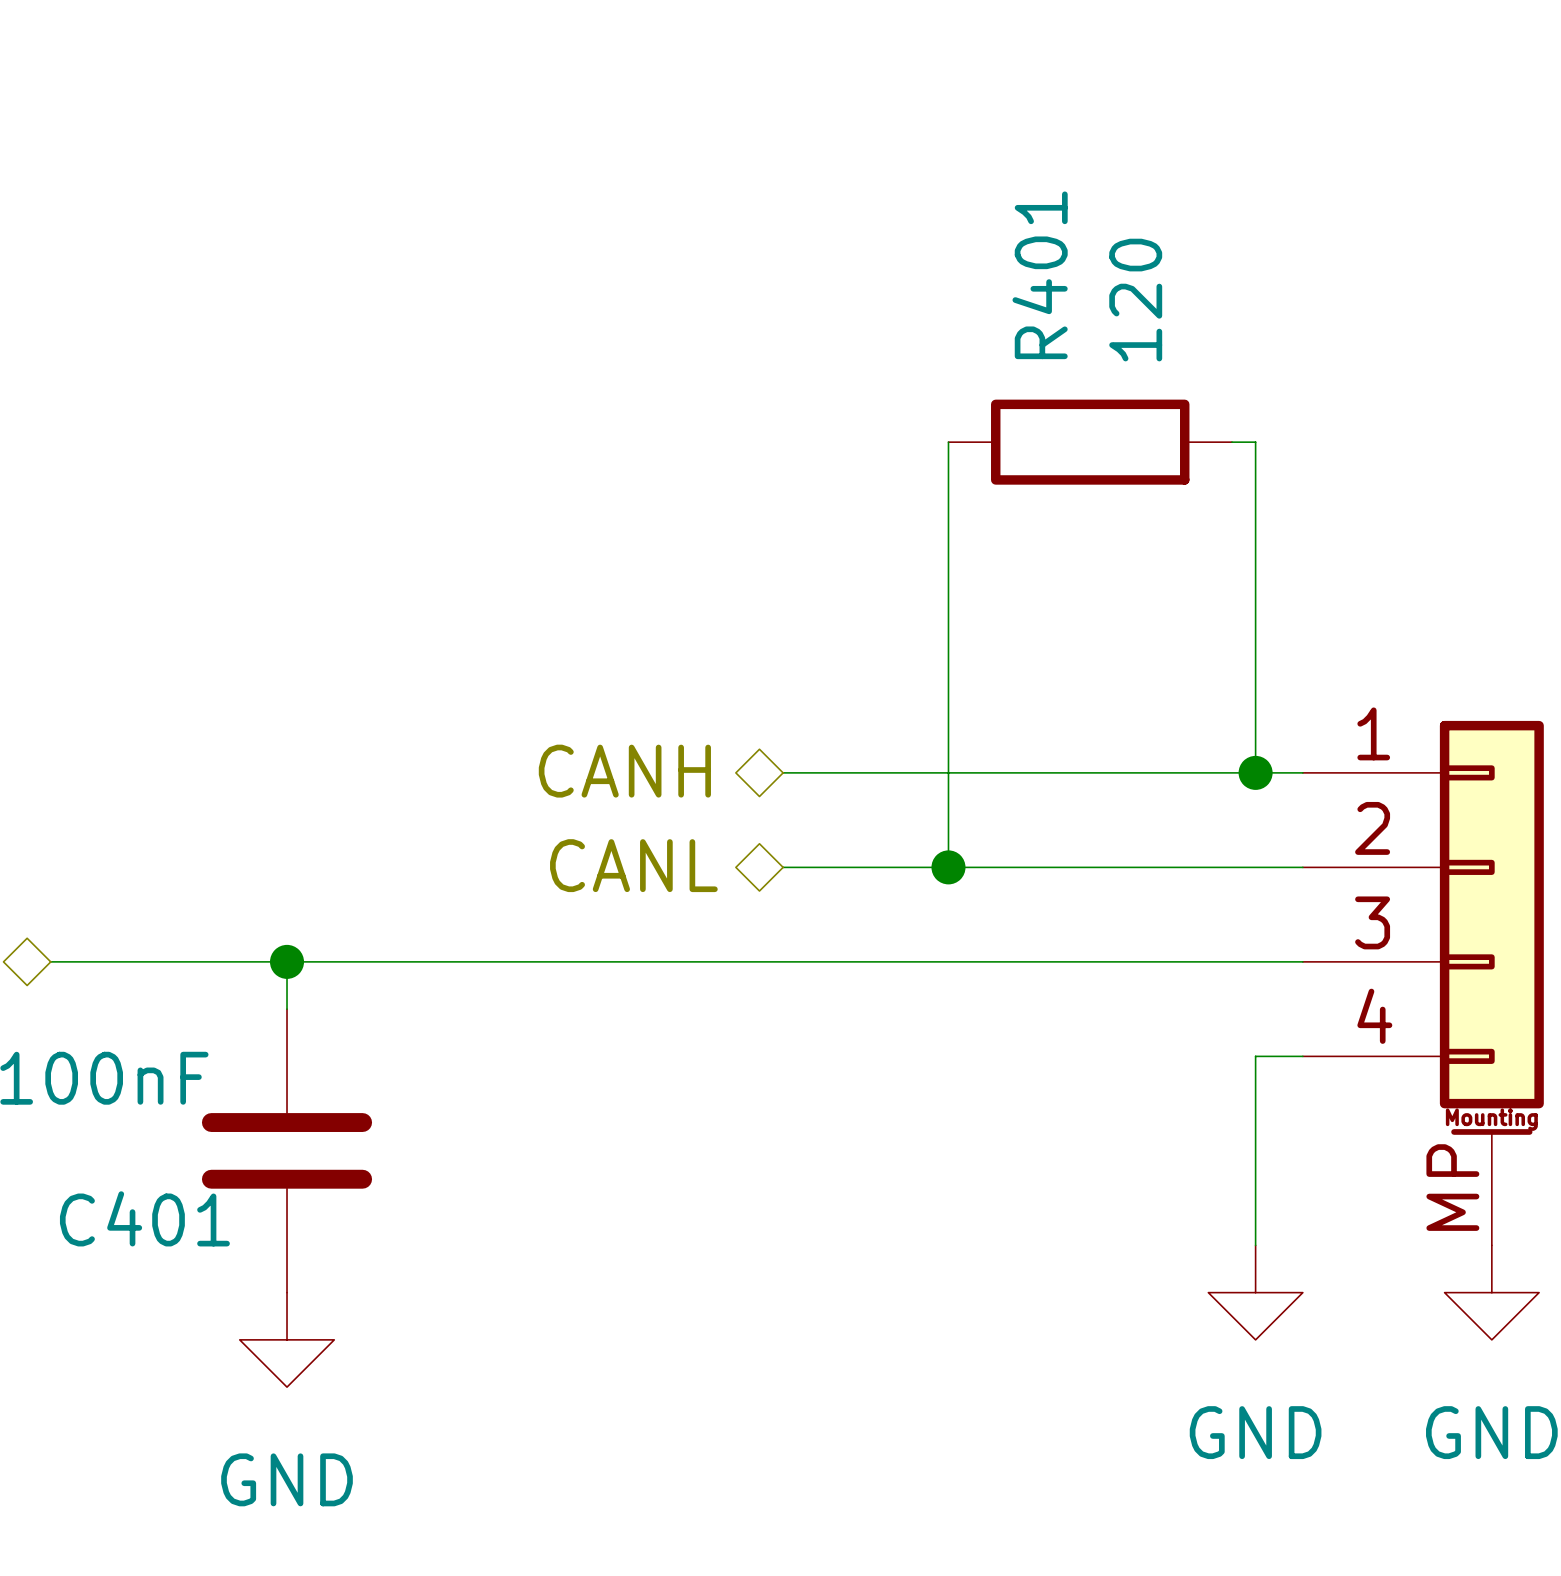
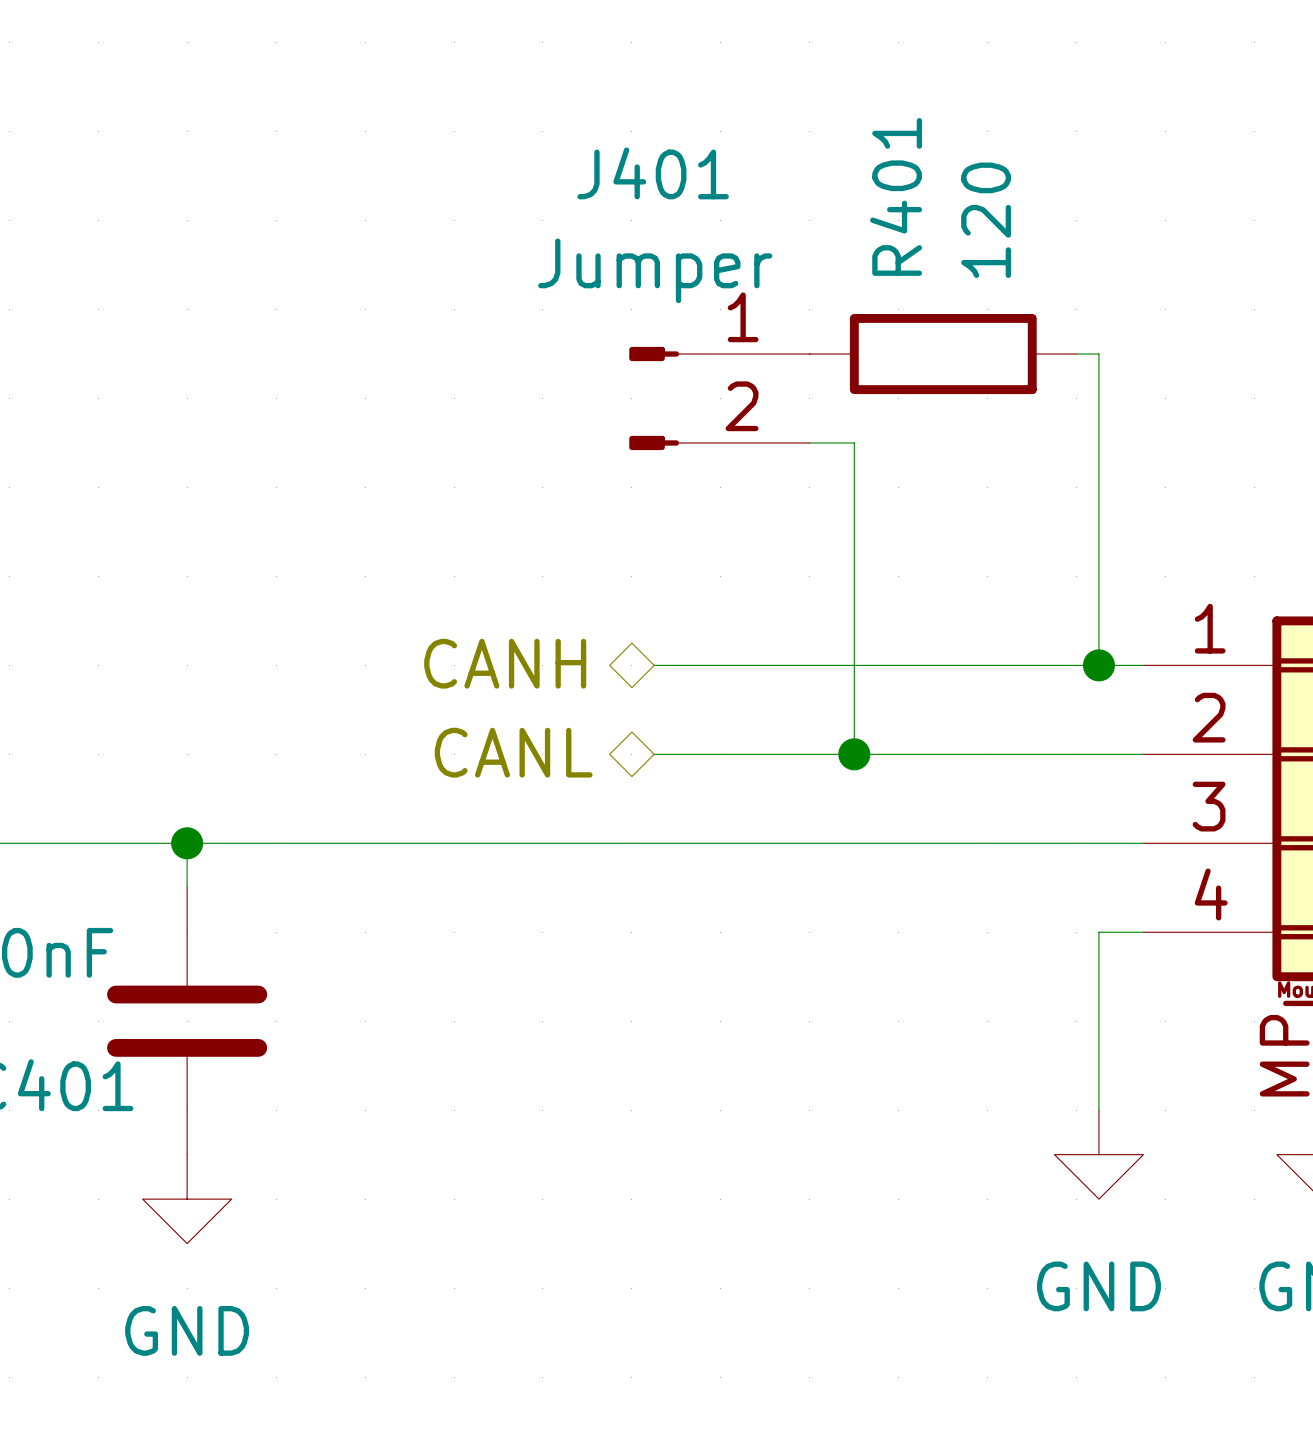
wire: (948, 442) (948, 867) -> none
J401: none -> Jumper (719, 398)
wire: none -> (809, 442) (854, 442) (854, 754)
junction position: (948, 867) -> (854, 754)

